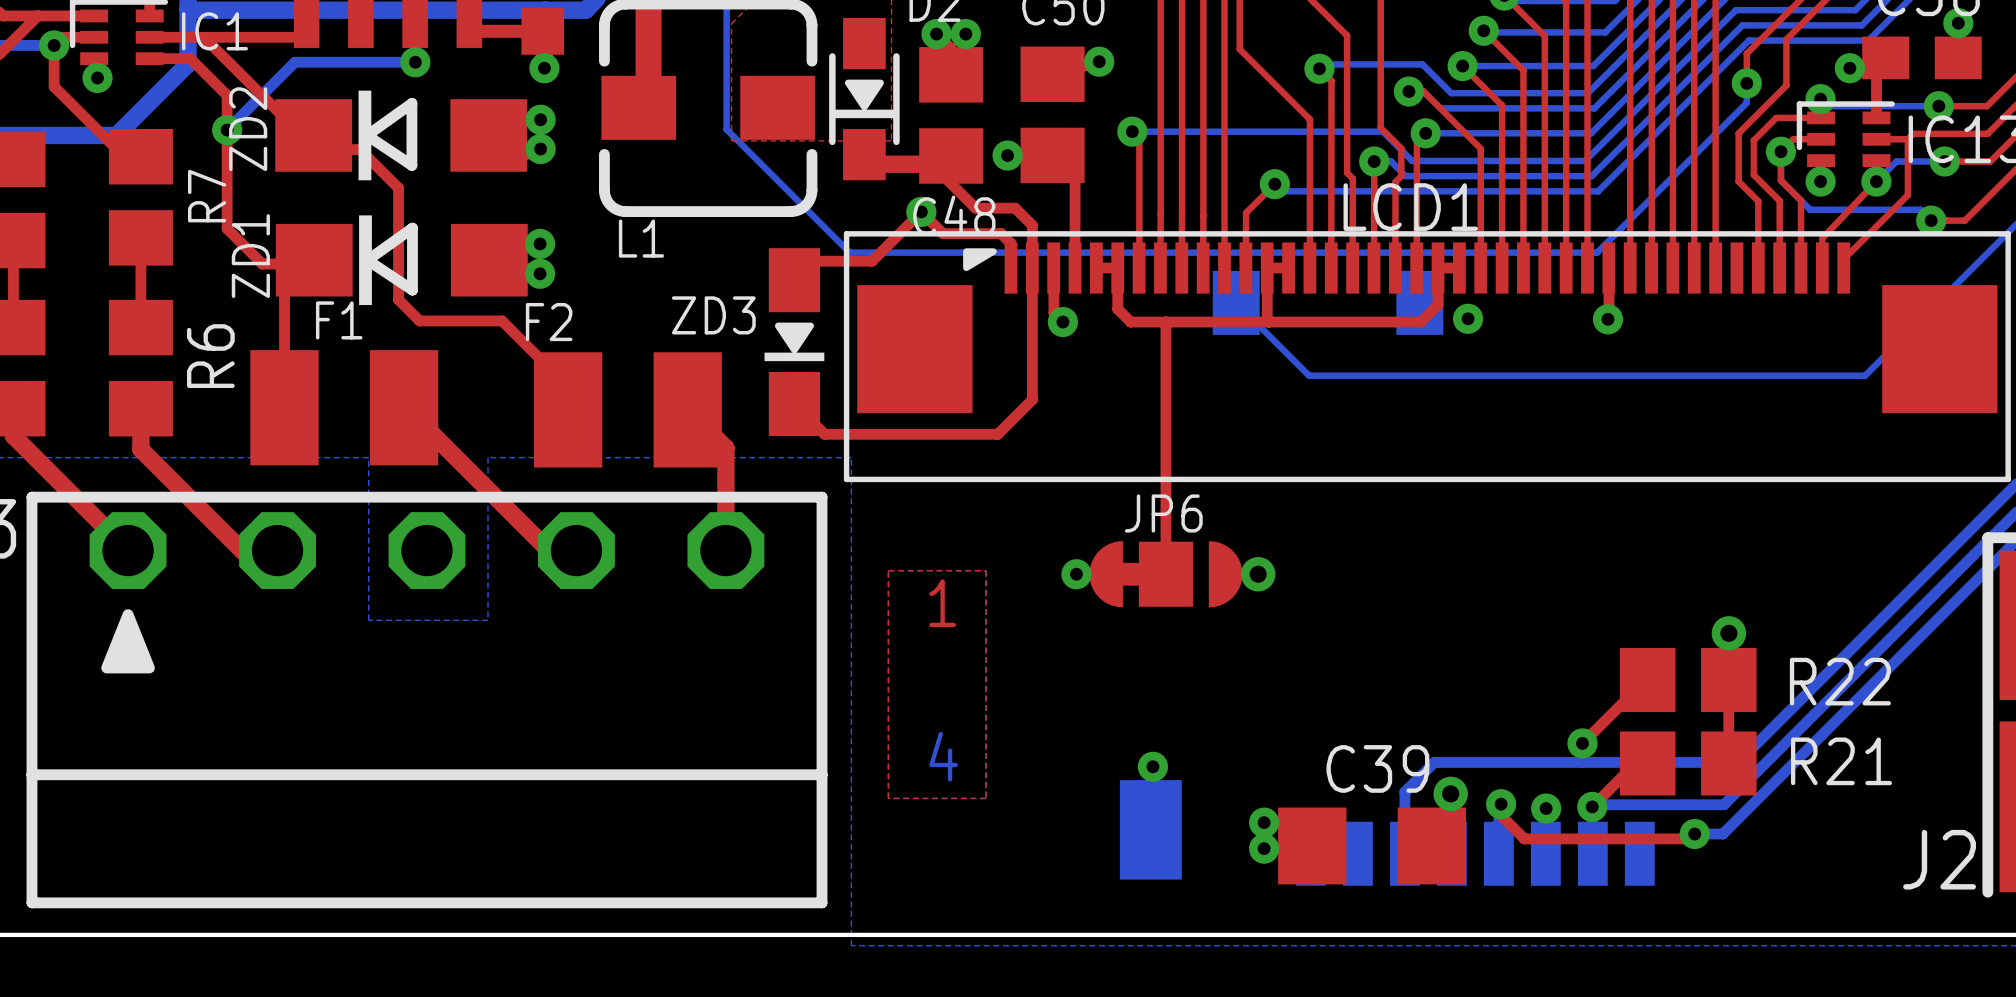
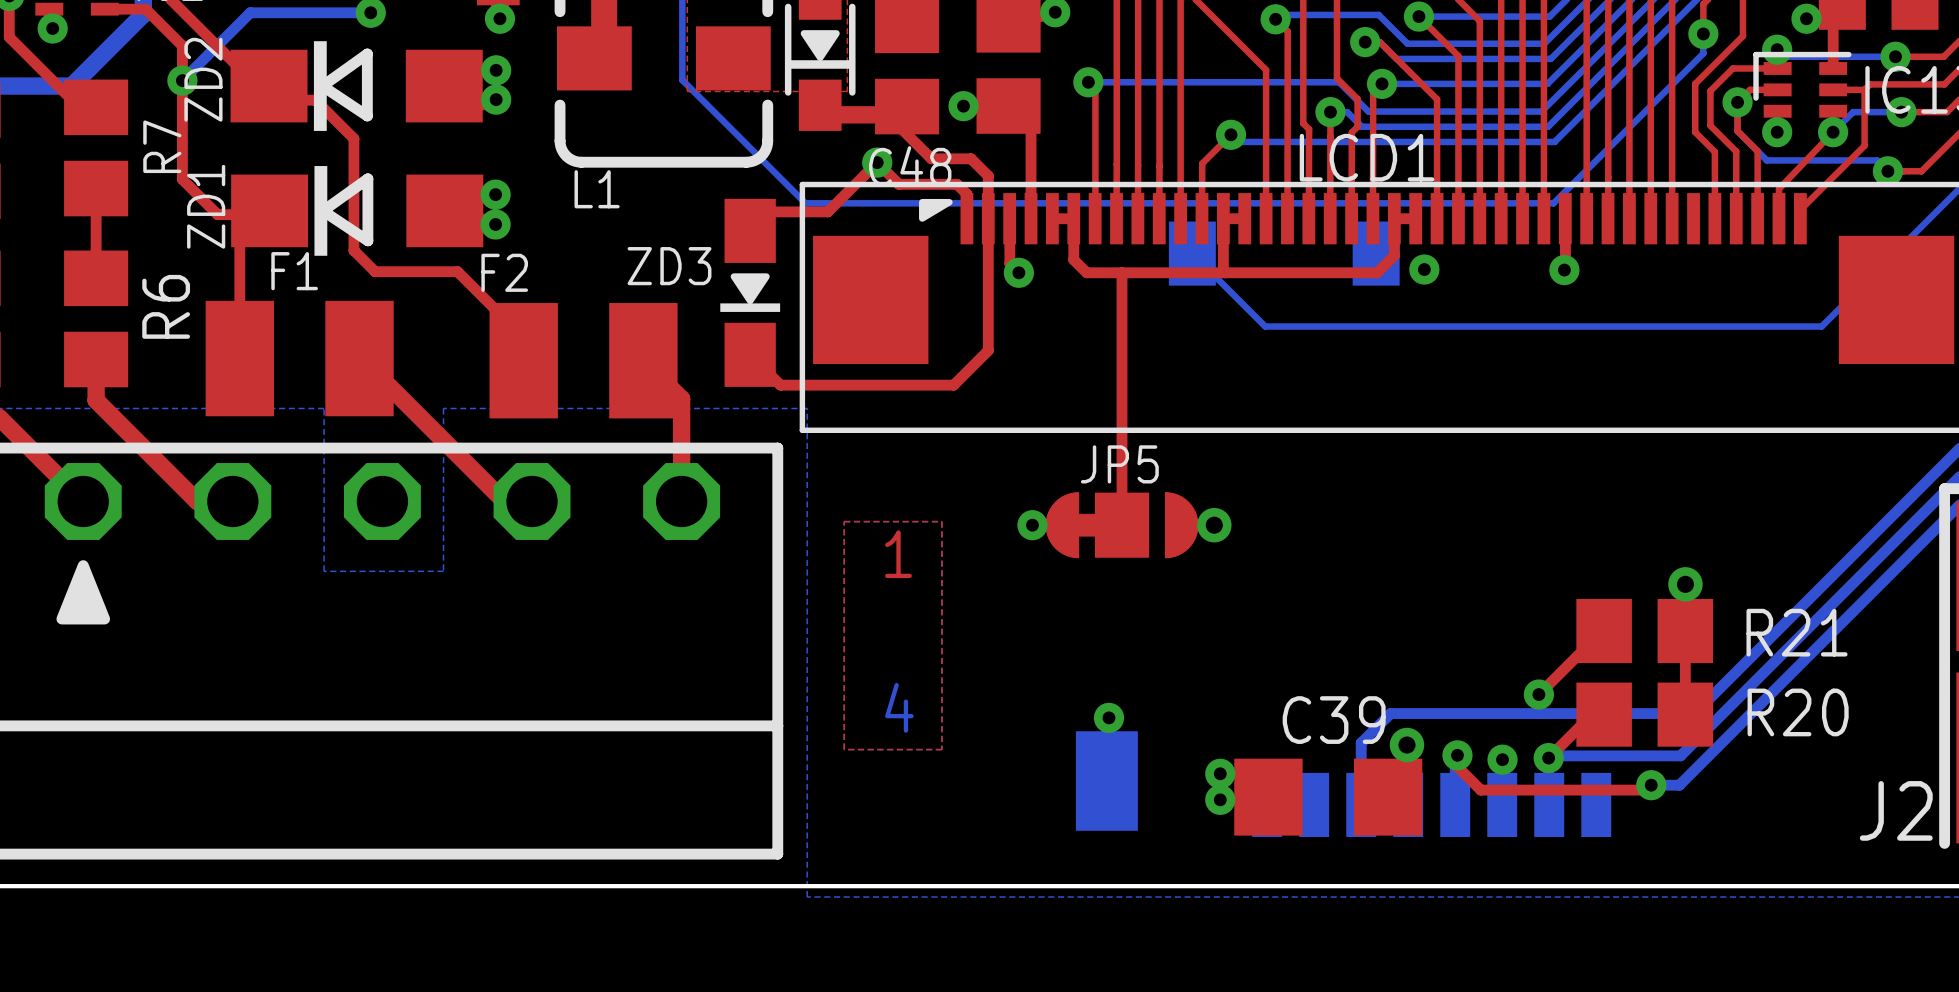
JP6 name: JP6 (1163, 513) -> JP5 (1119, 464)
R22 name: R22 (1840, 681) -> R21 (1797, 632)
R21 name: R21 (1841, 761) -> R20 (1798, 712)

